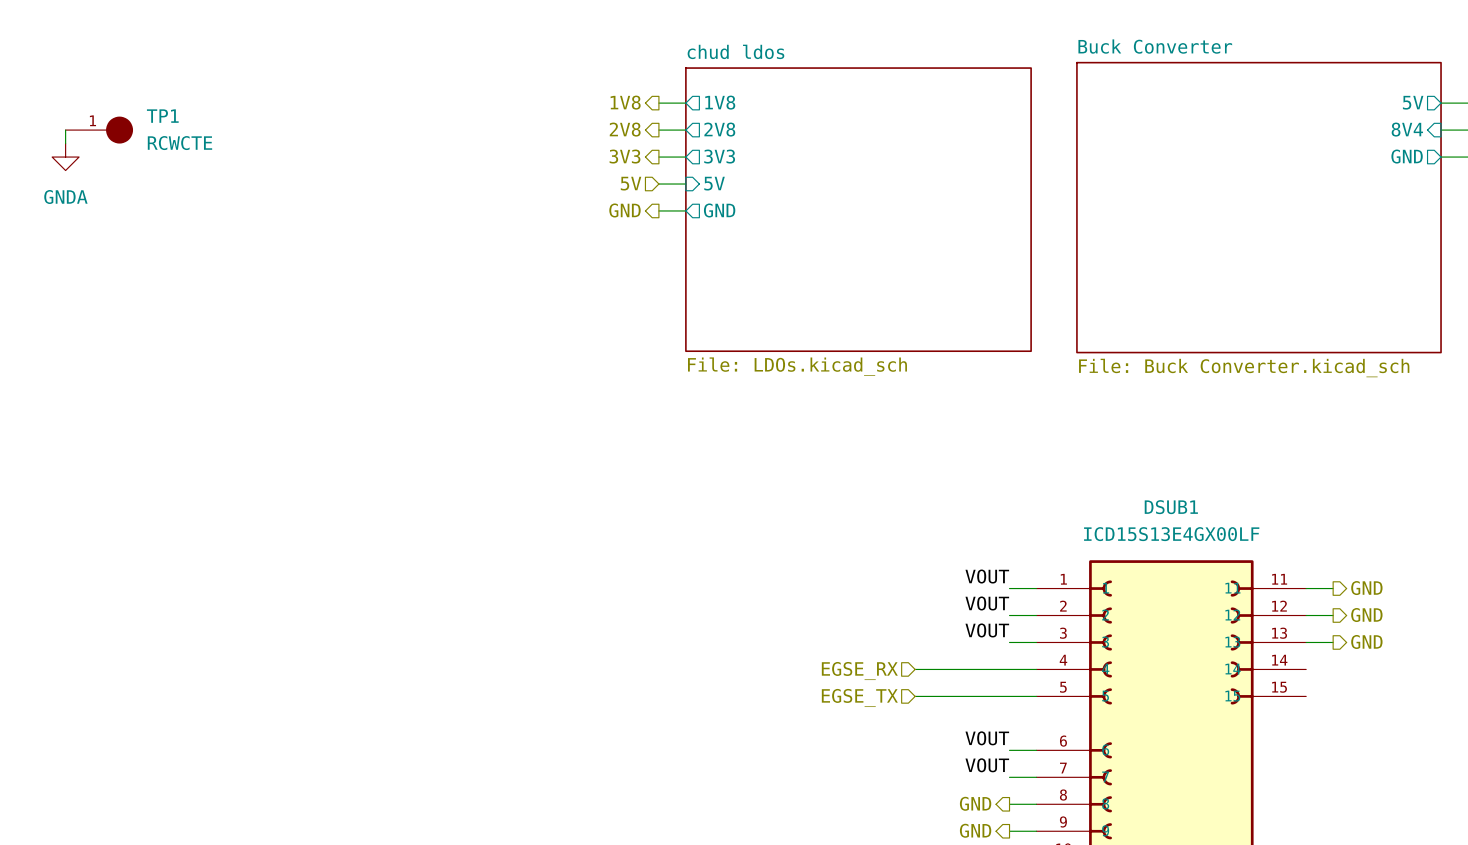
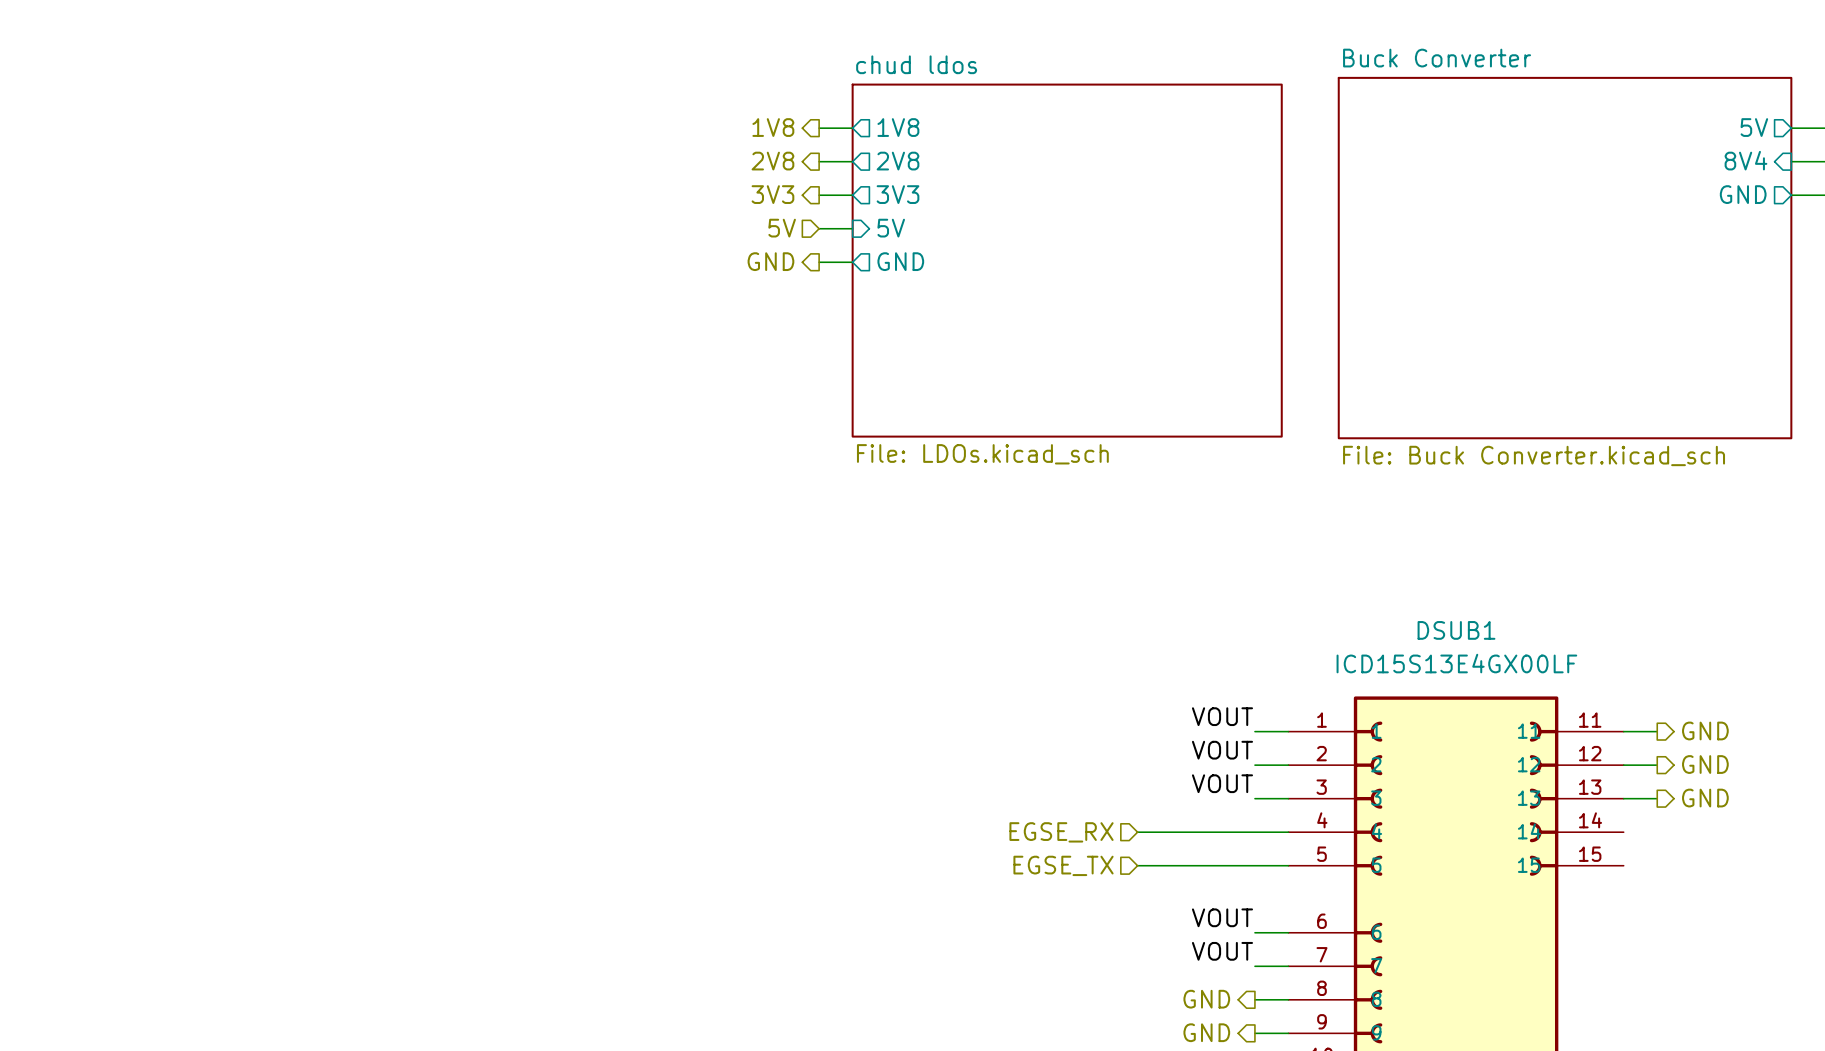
wire: (65, 130) (65, 143) -> none
TP1: RCWCTE (99, 130) -> none
power symbol: GNDA (65, 157) -> none

